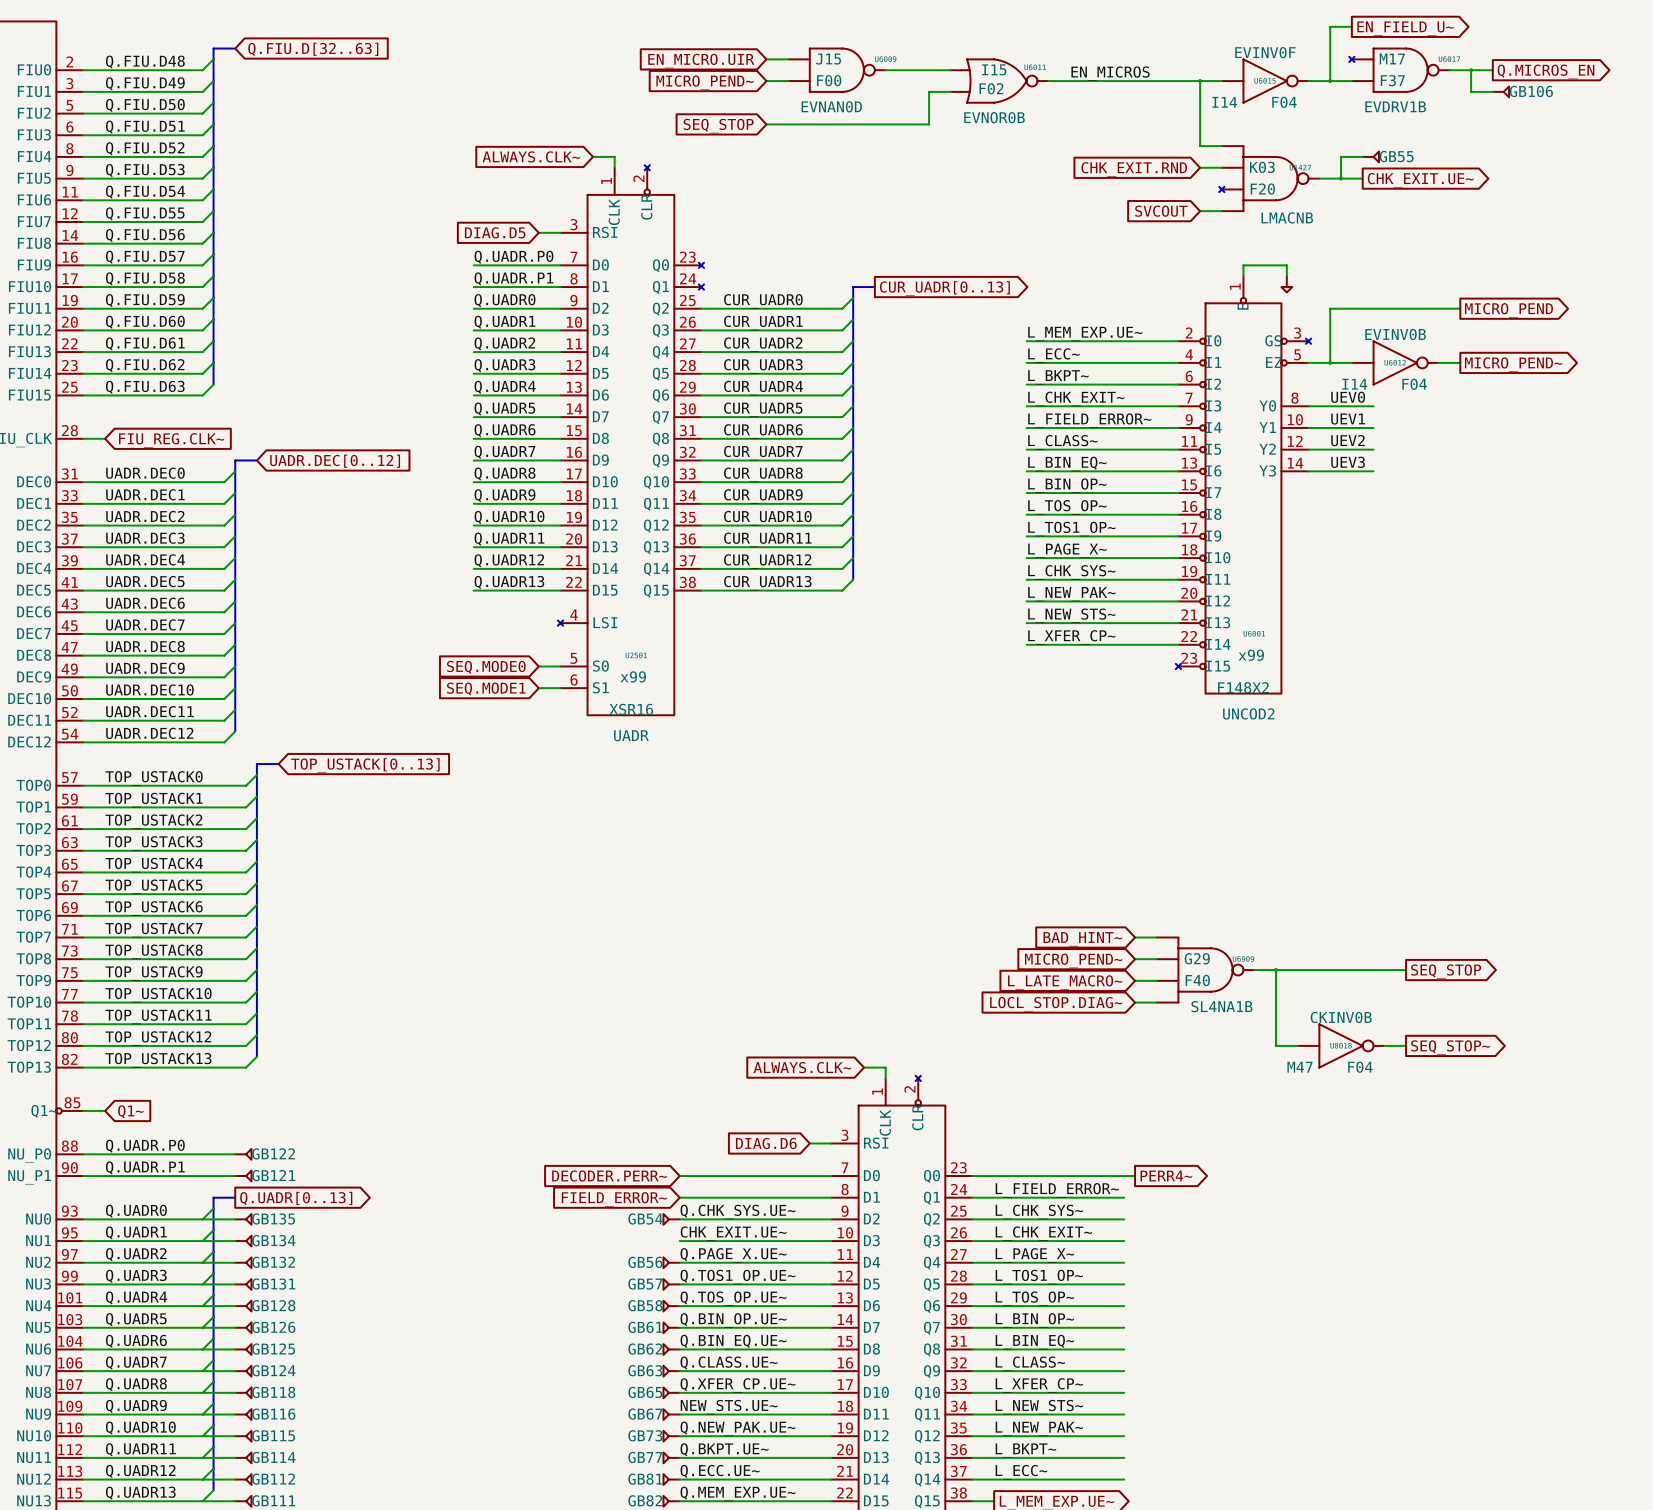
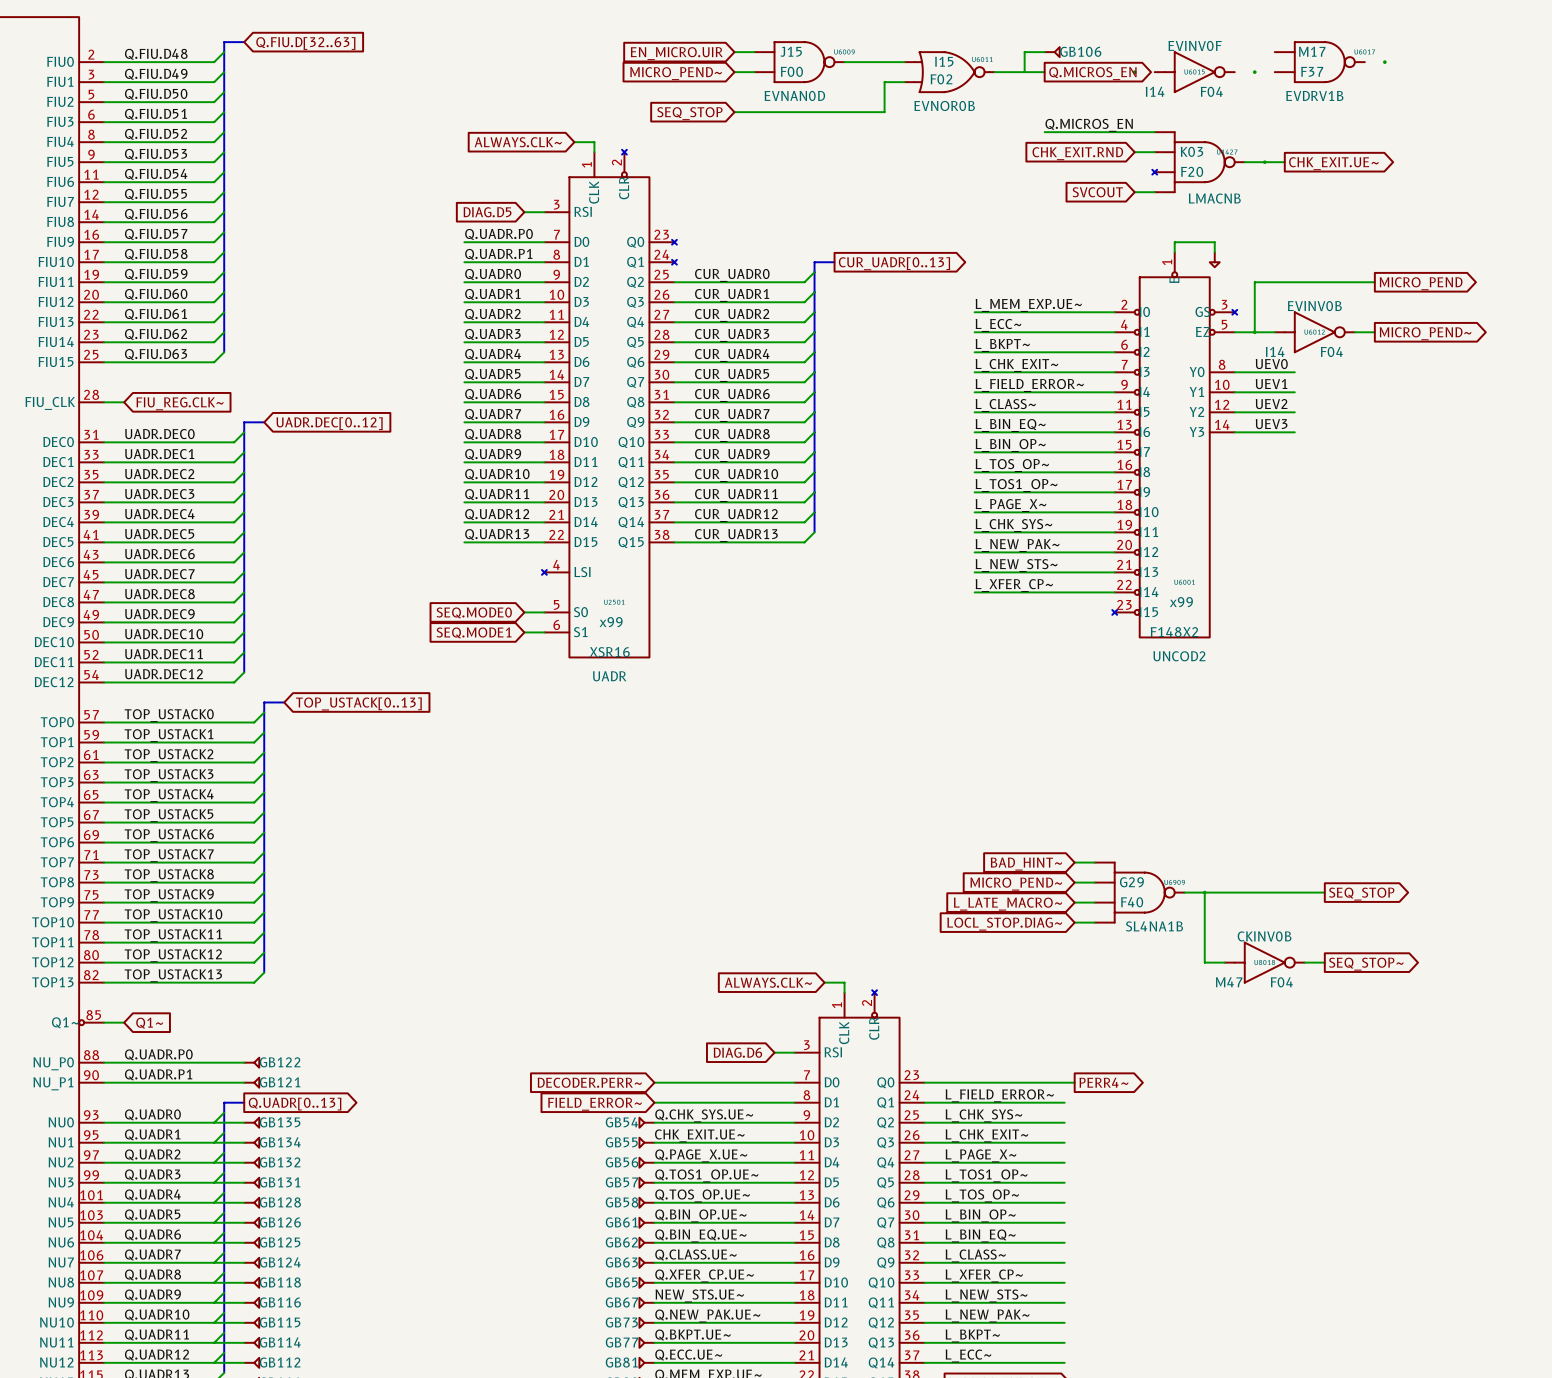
wire: (1351, 26) (1330, 26) (1330, 81) -> none
global label: EN_FIELD_U~ (1405, 28) -> none
wire: none -> (1044, 52) (1024, 52) (1024, 72)
no-connect mark: (1351, 59) -> none
wire: (1449, 70) (1492, 70) -> none
wire: (1471, 70) (1471, 91) (1492, 91) -> none
global label: Q.MICROS_EN (1546, 71) -> none
label: EN_MICROS (1110, 73) -> none
wire: (1102, 81) (1221, 81) -> none
wire: (1200, 81) (1200, 146) -> (1044, 132) (1134, 132)
wire: (1308, 81) (1351, 81) -> none
global label: none -> Q.MICROS_EN (1092, 73)
GB106 position: (1501, 91) -> (1052, 52)
label: none -> Q.MICROS_EN (1089, 125)
wire: (1362, 156) (1341, 156) (1341, 178) -> none
GB55 position: (1371, 156) -> (646, 1142)
GB55 rotation: 0° (1376, 156) -> 180° (641, 1142)

